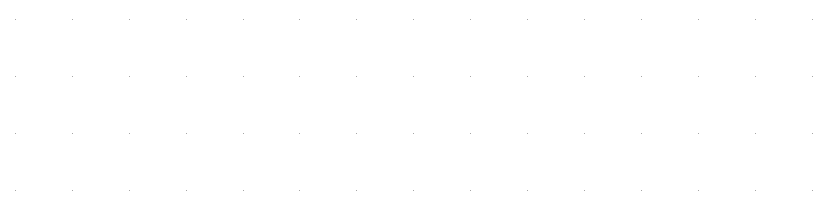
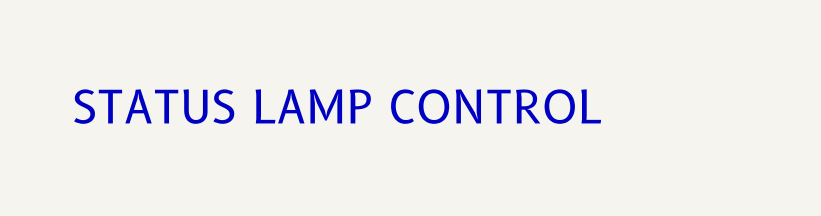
text: none -> STATUS LAMP CONTROL (337, 106)

